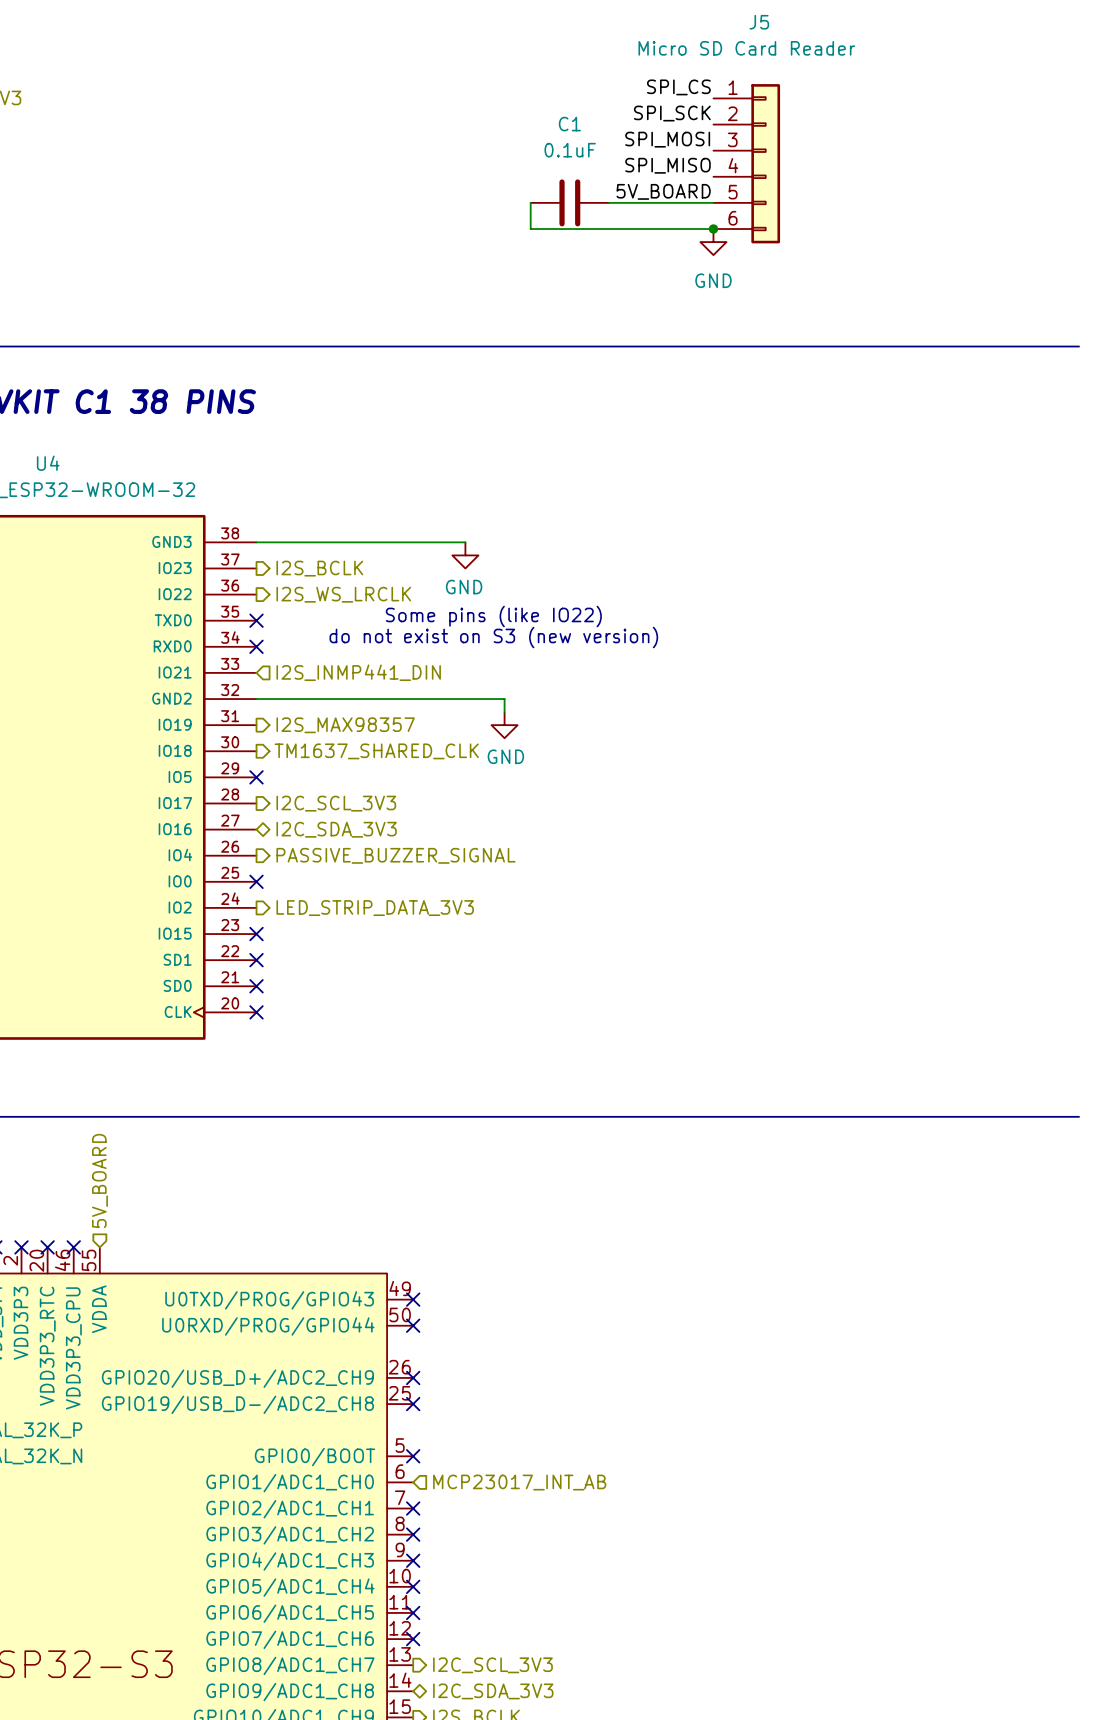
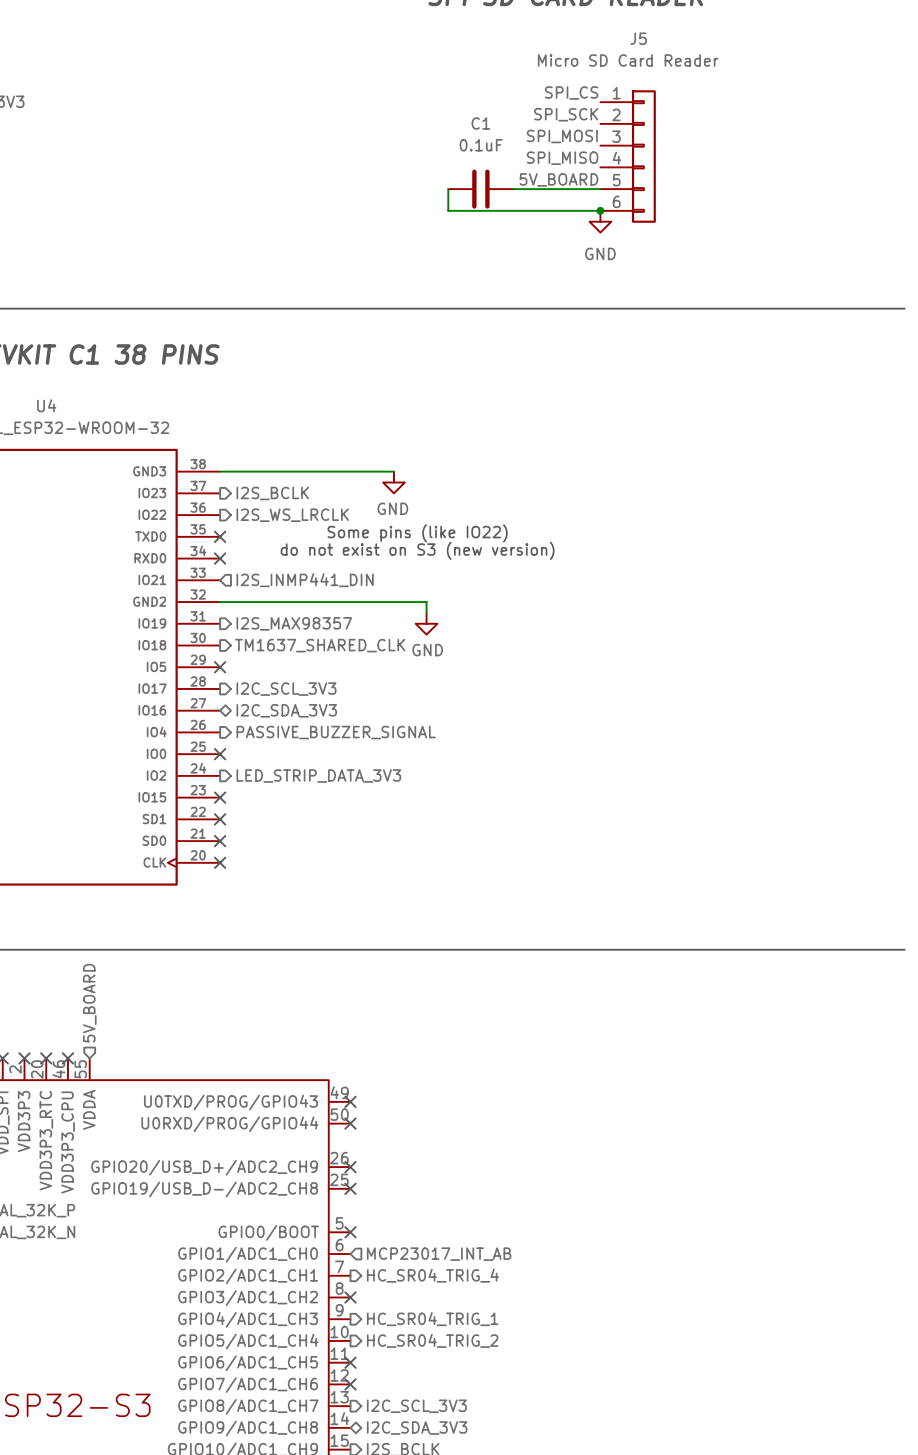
no-connect mark: (413, 1508) -> none
hierarchical label: none -> HC_SR04_TRIG_4 (432, 1275)
no-connect mark: (413, 1560) -> none
hierarchical label: none -> HC_SR04_TRIG_1 (432, 1319)
no-connect mark: (413, 1586) -> none
hierarchical label: none -> HC_SR04_TRIG_2 (432, 1340)

